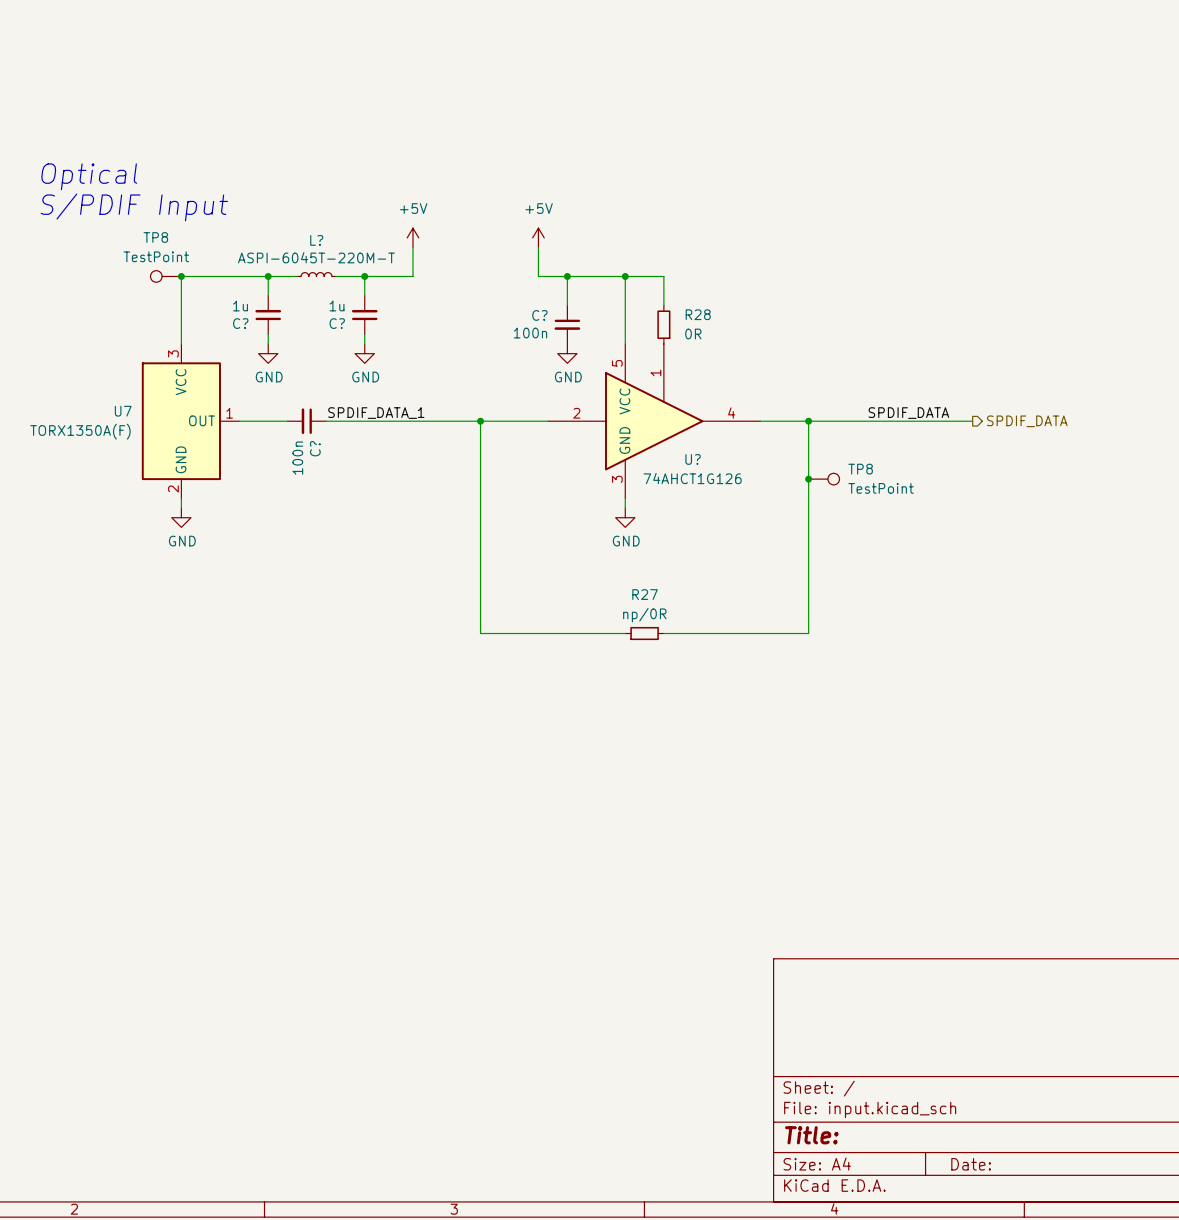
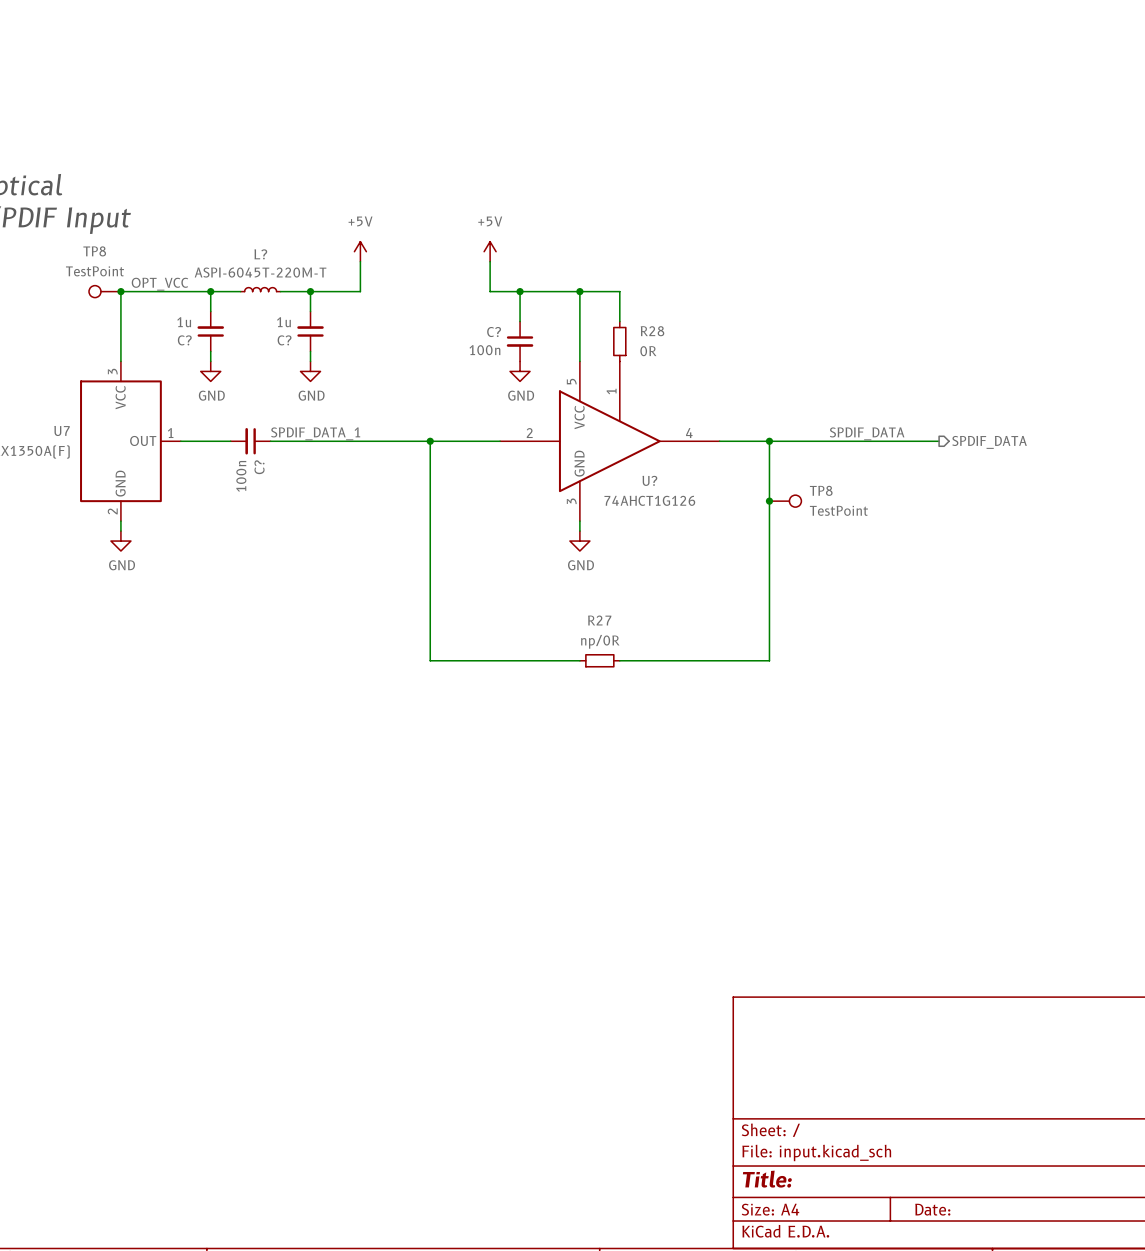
label: none -> OPT_VCC (159, 284)

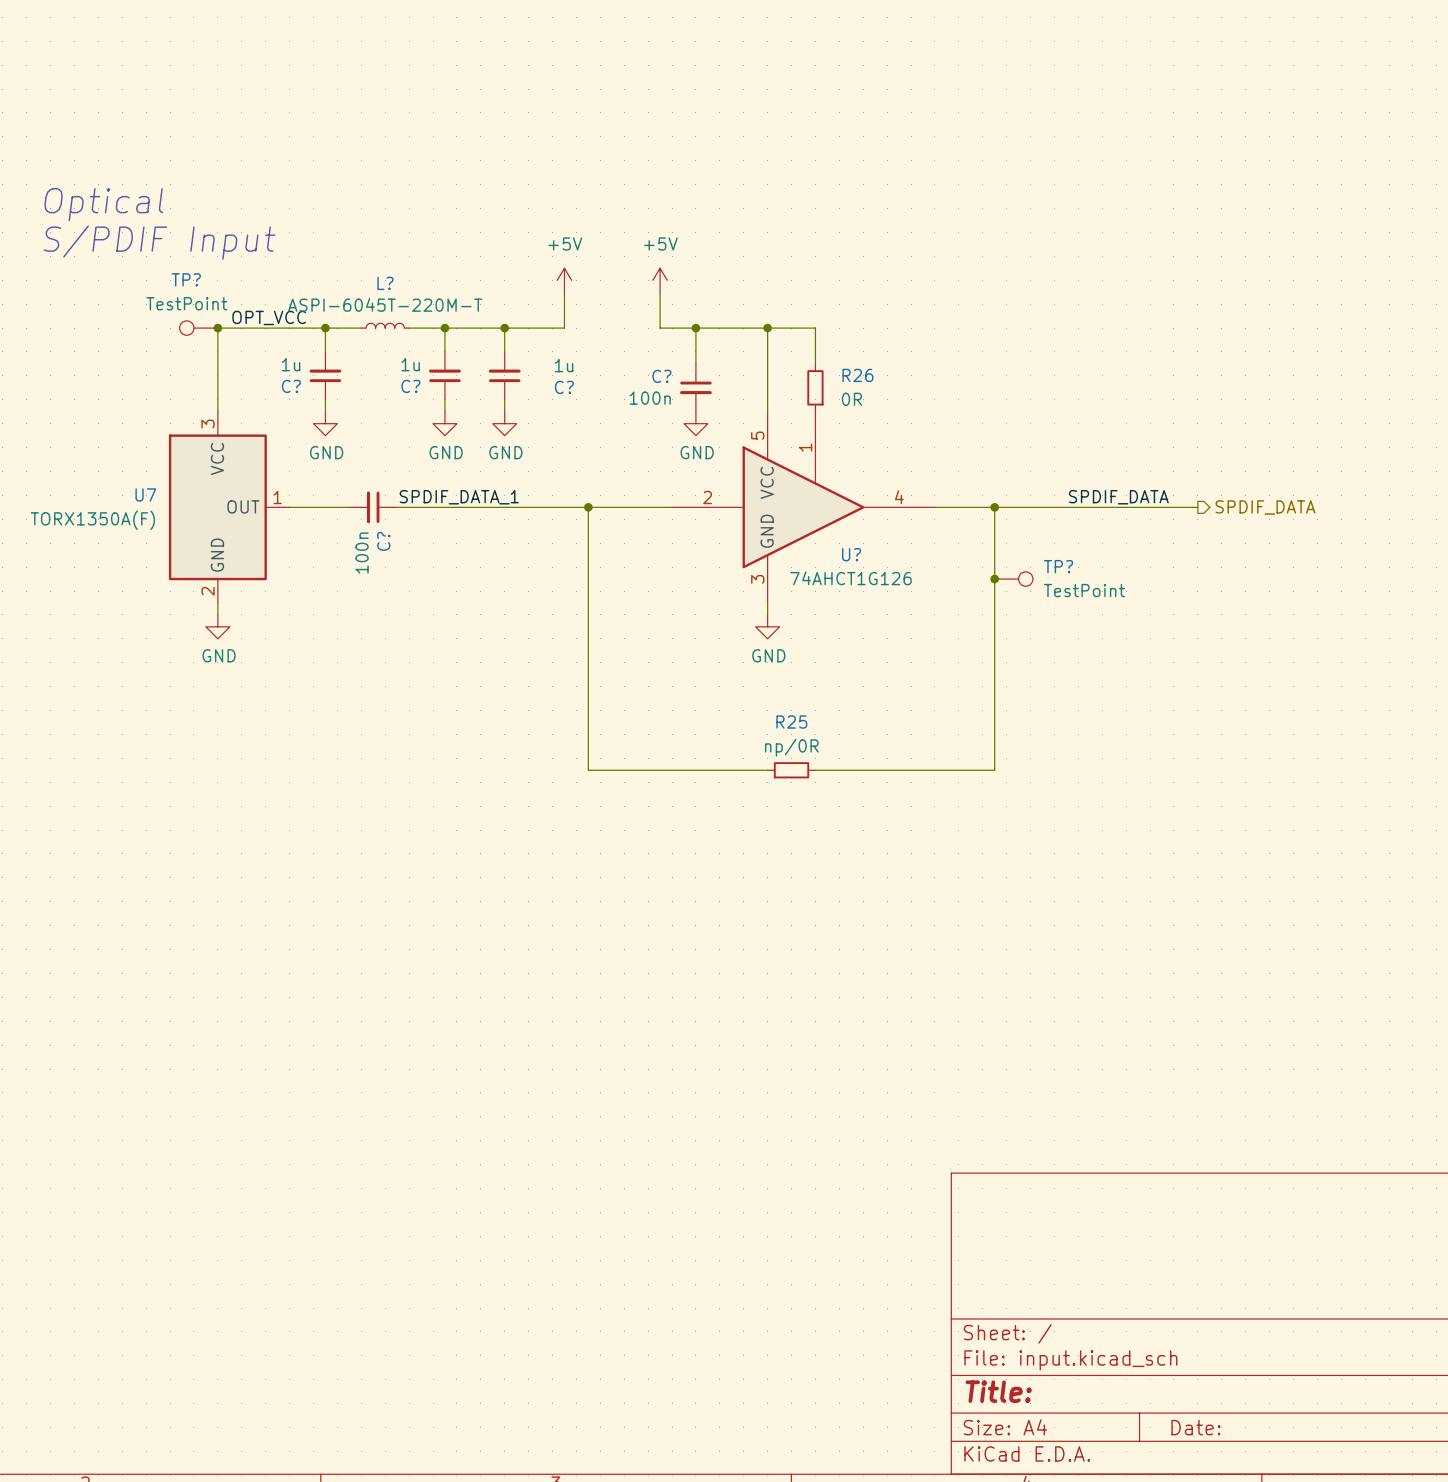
TP8 name: TP8 (94, 251) -> TP? (186, 279)
power symbol position: +5V (360, 251) -> +5V (564, 280)
wire: (360, 261) (360, 291) -> none
wire: none -> (564, 292) (564, 328) (504, 328) (504, 351)
junction: none -> (504, 328)
C?: none -> 1u (504, 375)
R28 name: R28 (652, 331) -> R26 (857, 375)
wire: none -> (504, 399) (504, 411)
power symbol: none -> GND (504, 423)
TP8 name: TP8 (821, 490) -> TP? (1058, 566)
R27 name: R27 (599, 620) -> R25 (791, 722)

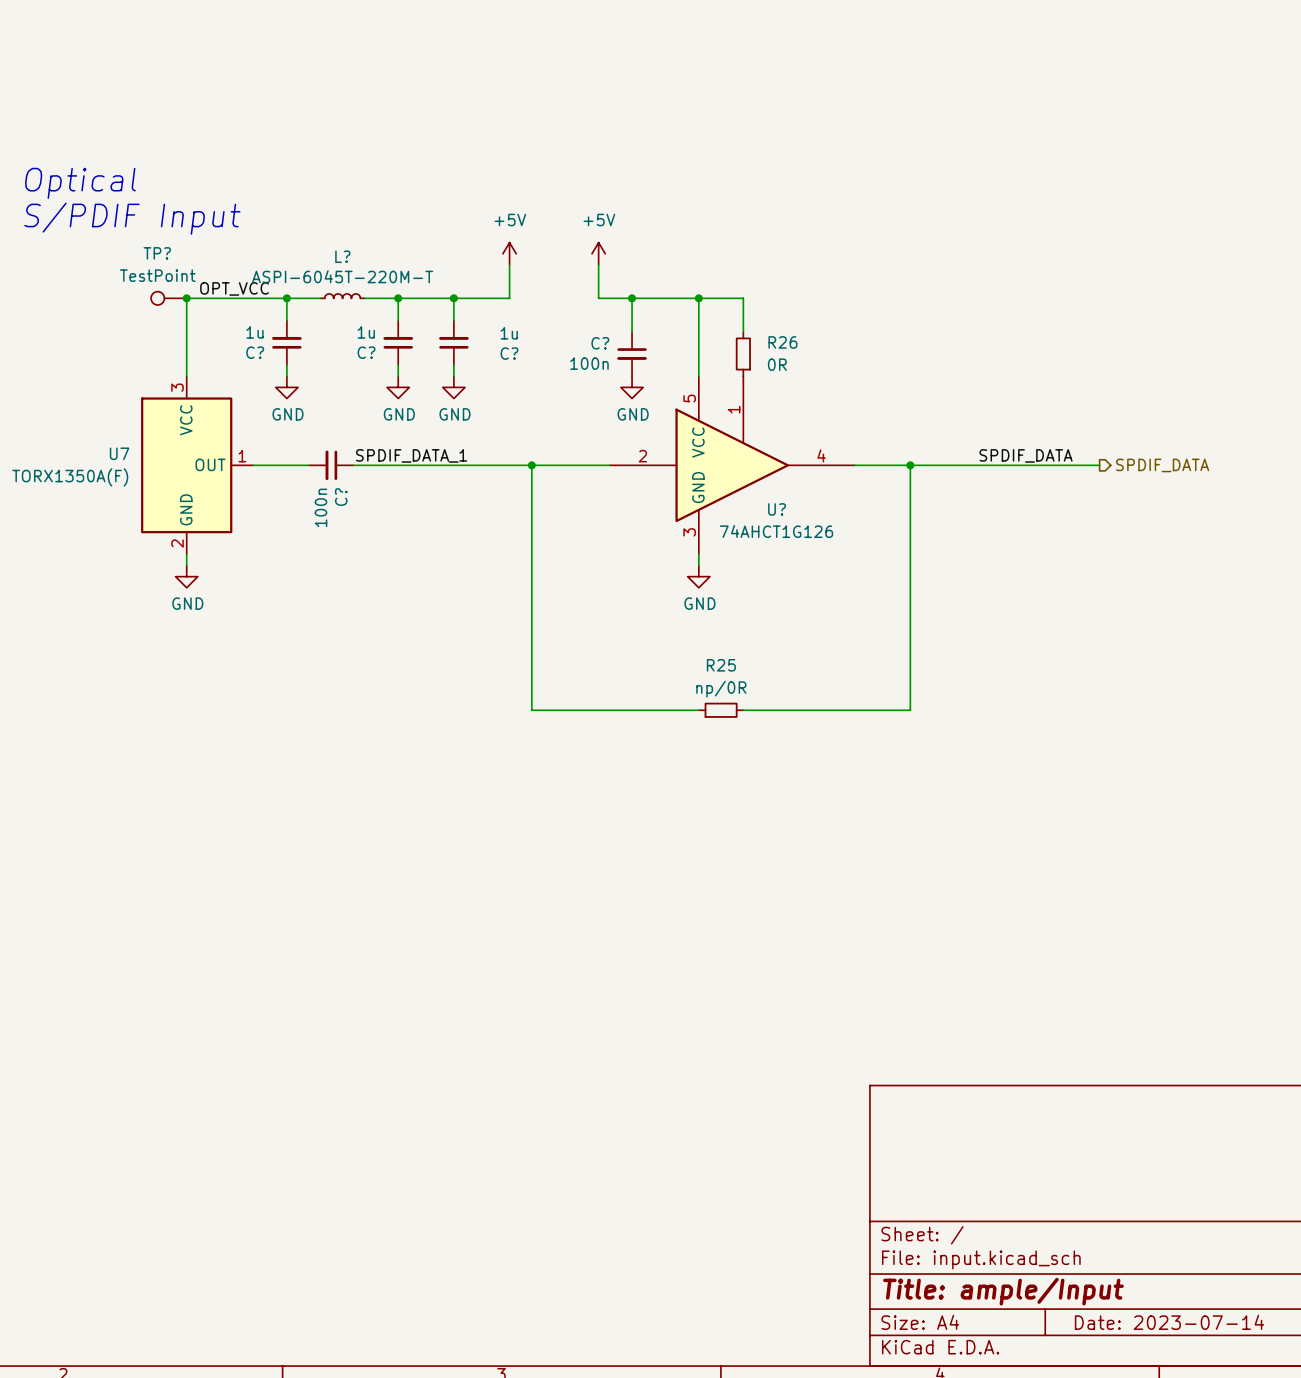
junction: (994, 579) -> none
TP?: TestPoint (1013, 579) -> none
title block: Title: (998, 1391) -> Title: ample/Input (1003, 1291)
title block: Date: (1195, 1427) -> Date: 2023-07-14 (1169, 1322)

